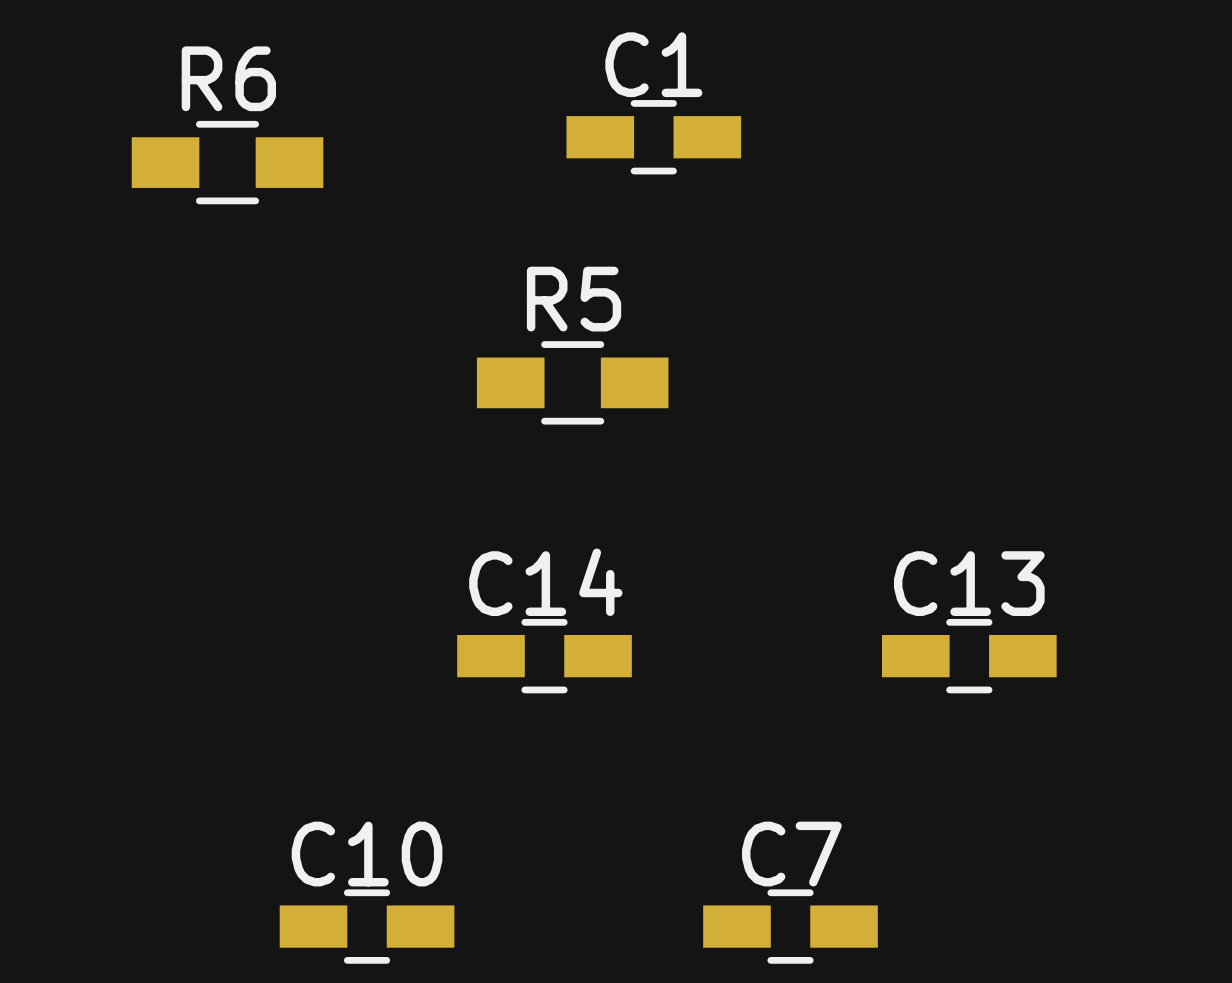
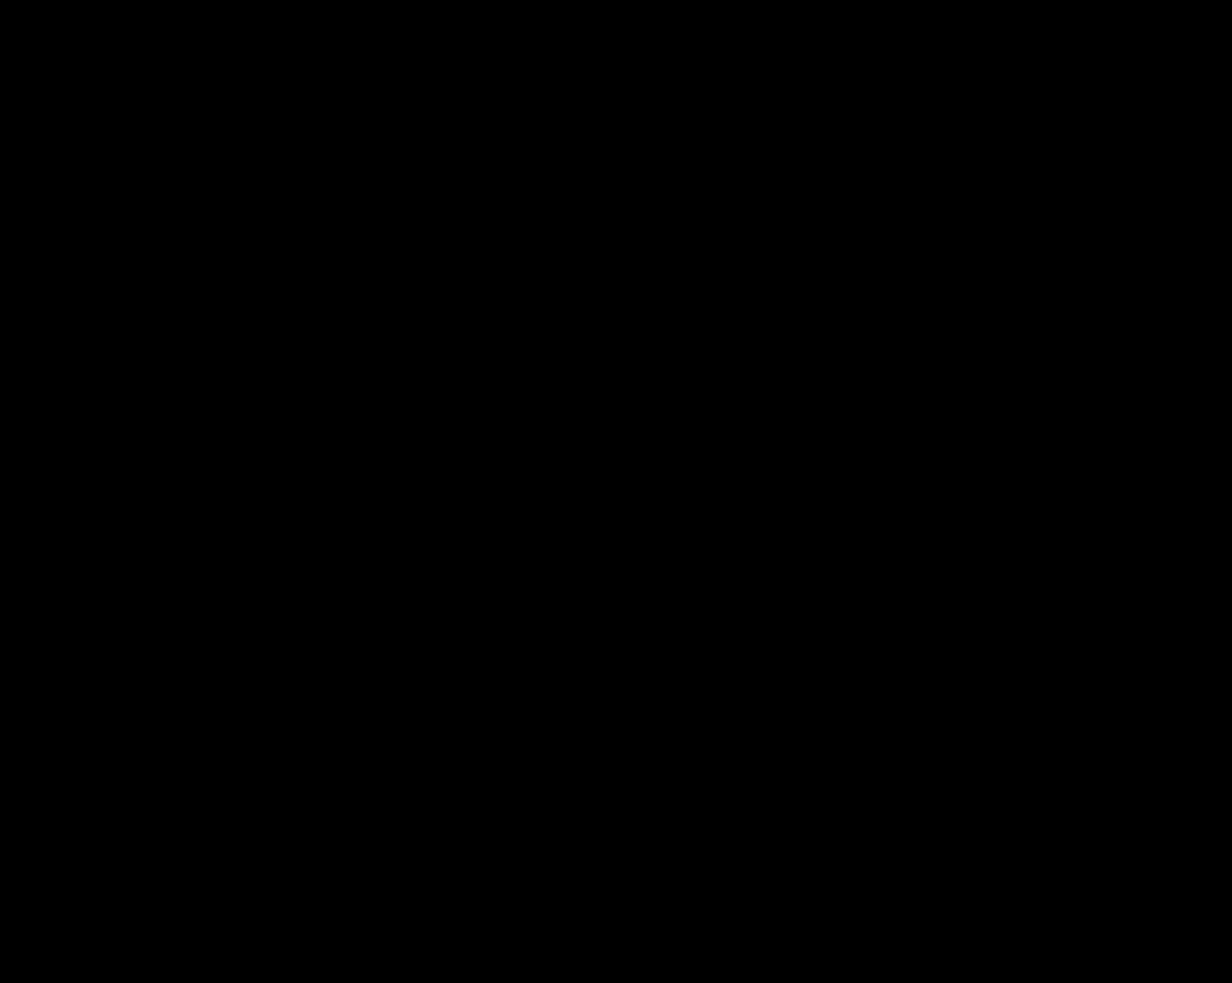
C1: (653, 137) -> none
R6: (227, 162) -> none
R5: (572, 382) -> none
C14: (544, 656) -> none
C13: (969, 656) -> none
C10: (367, 926) -> none
C7: (790, 926) -> none

